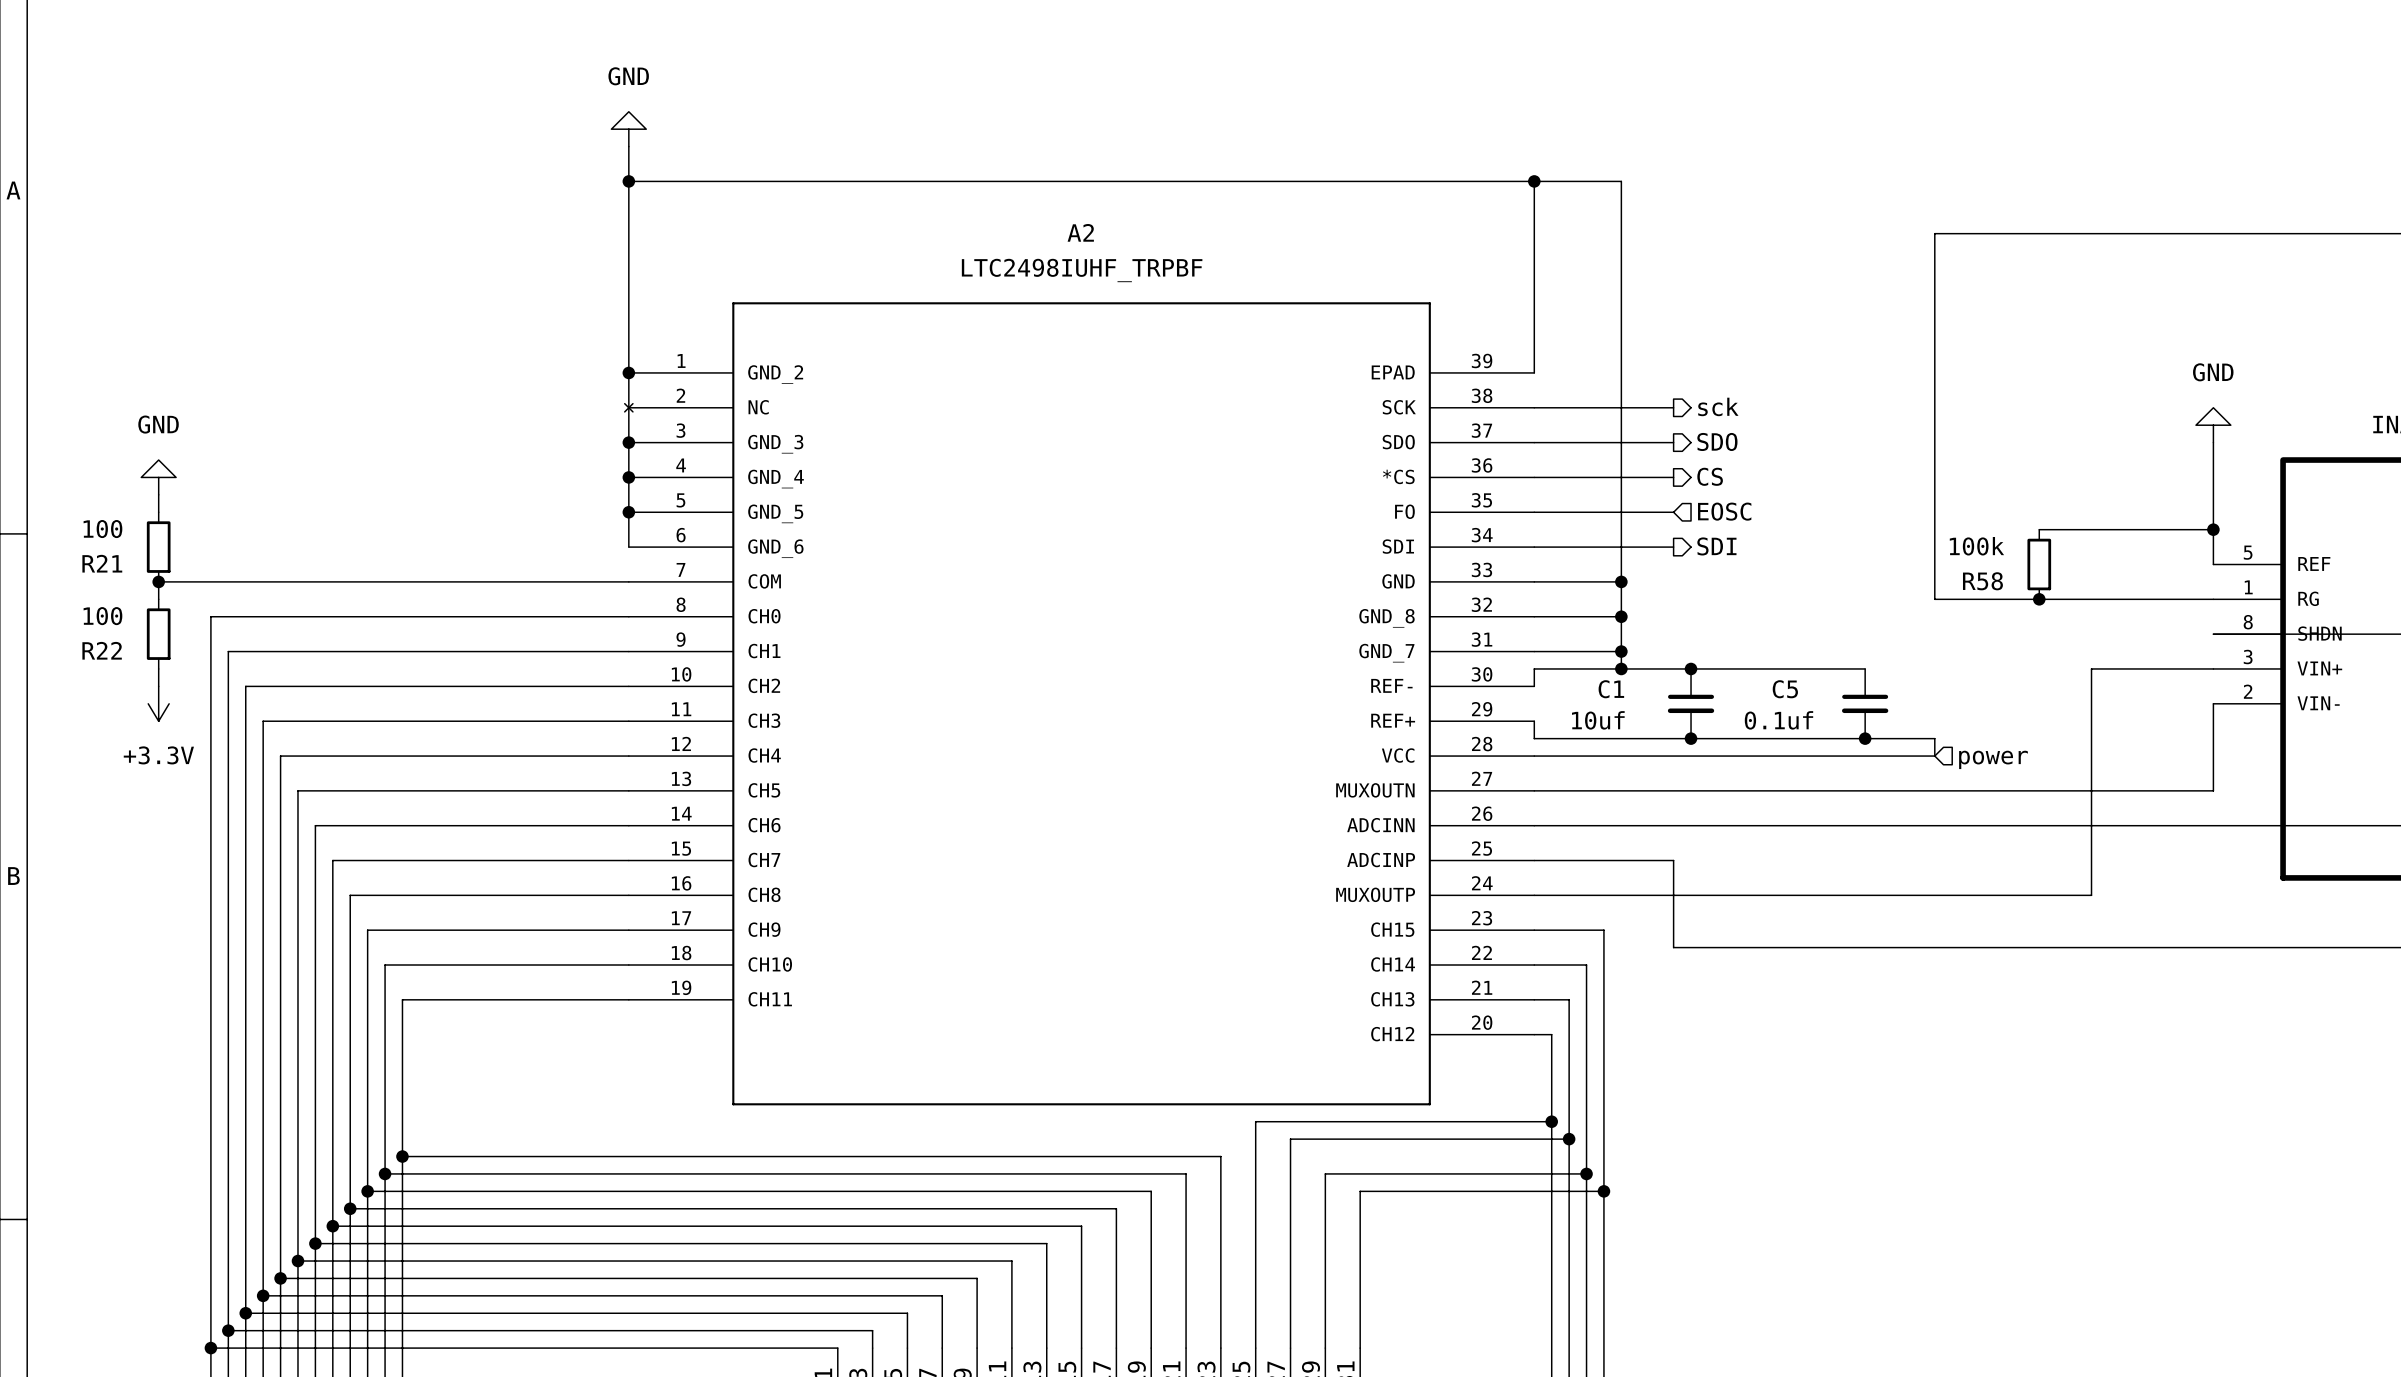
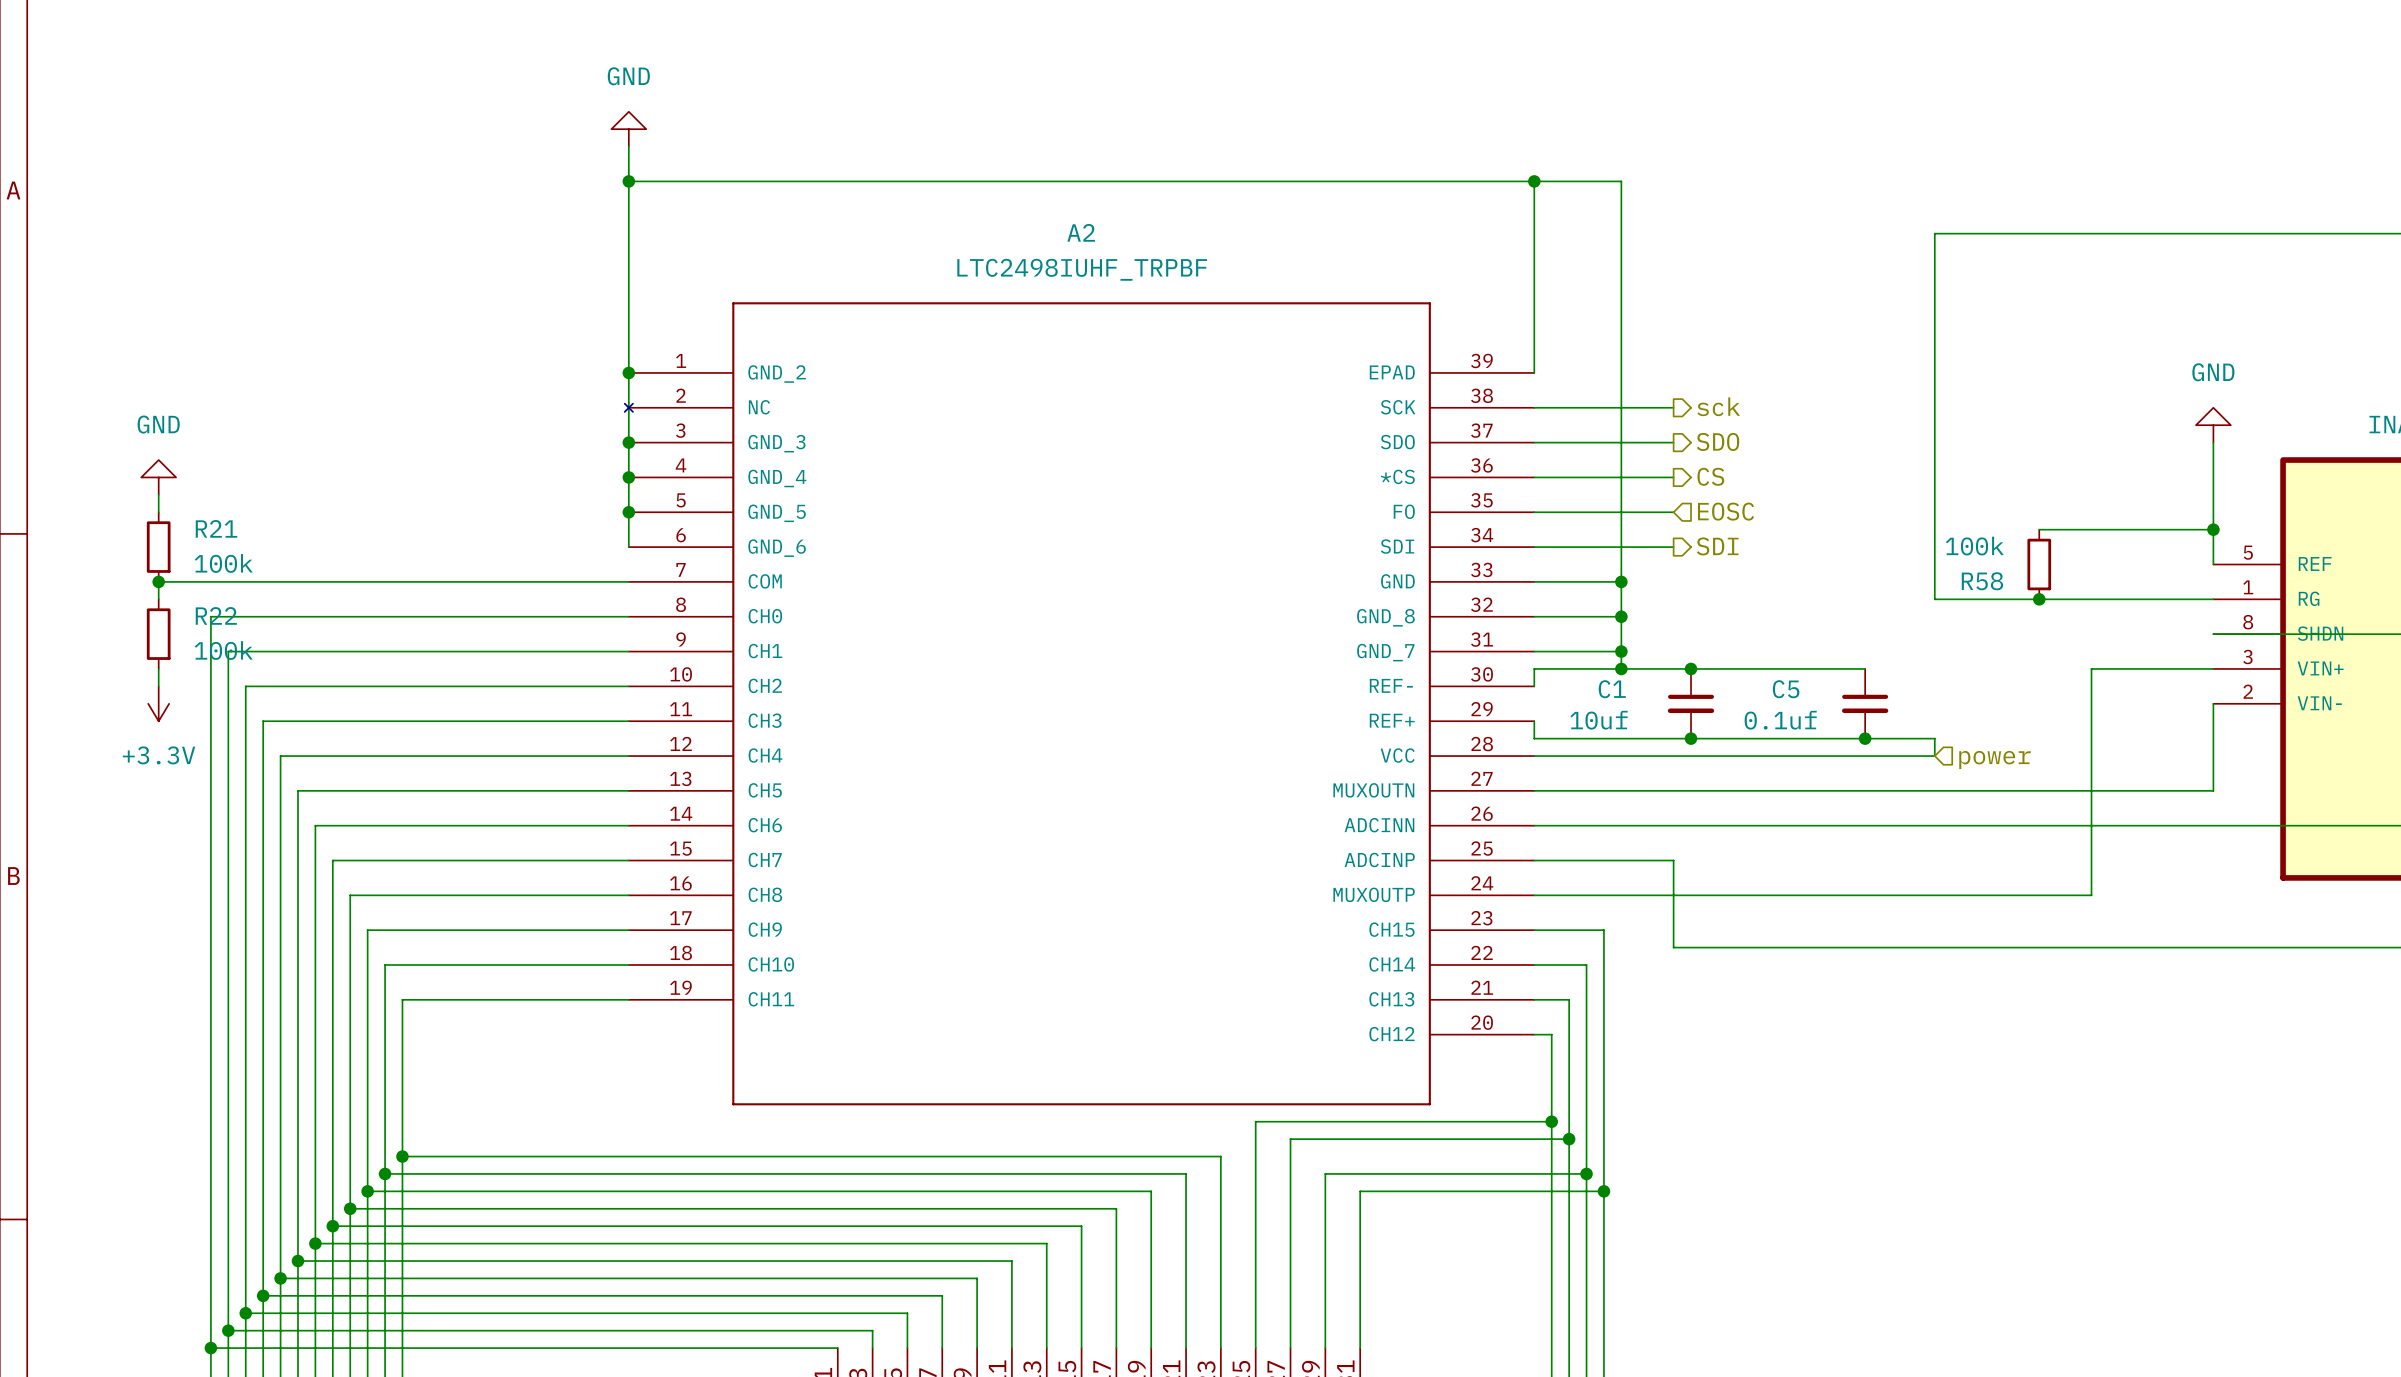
R21 value: 100 (102, 529) -> 100k (223, 563)
R21 name position: R21 (102, 563) -> R21 (216, 528)
R22 value: 100 (102, 616) -> 100k (223, 650)
R22 name position: R22 (102, 650) -> R22 (216, 615)

